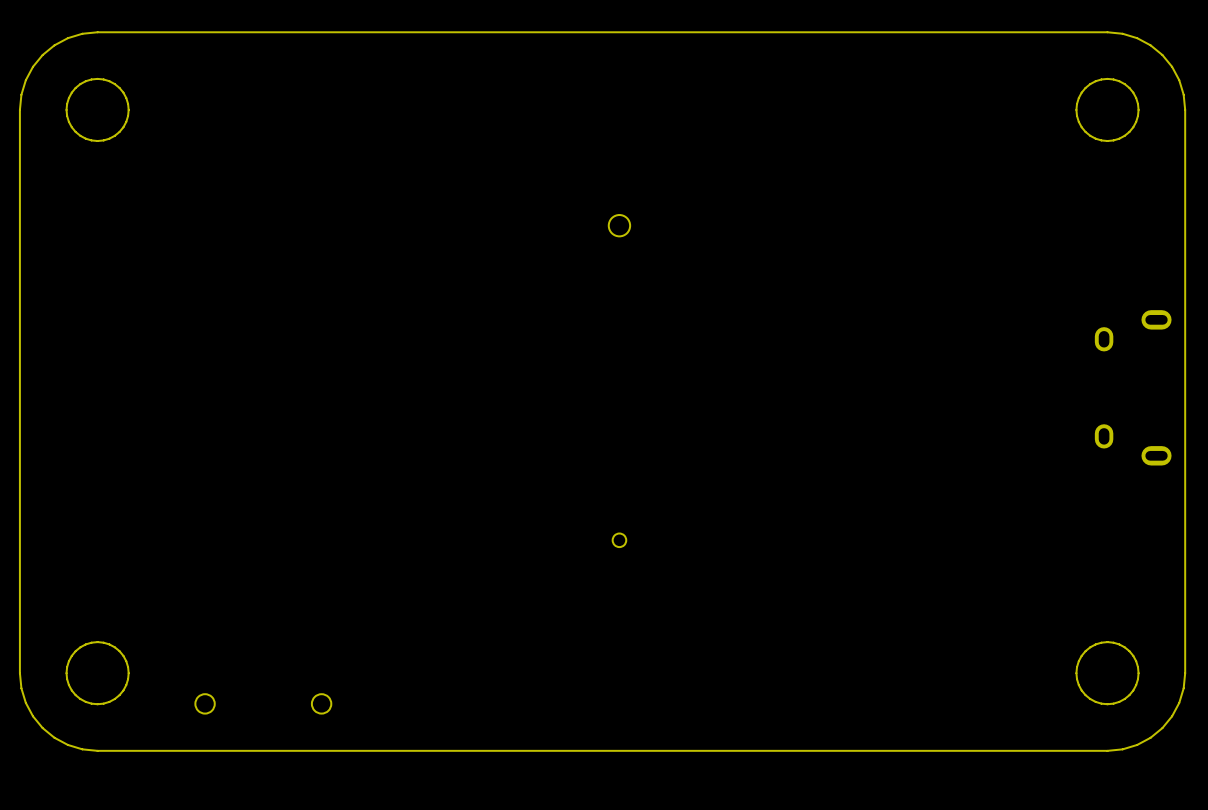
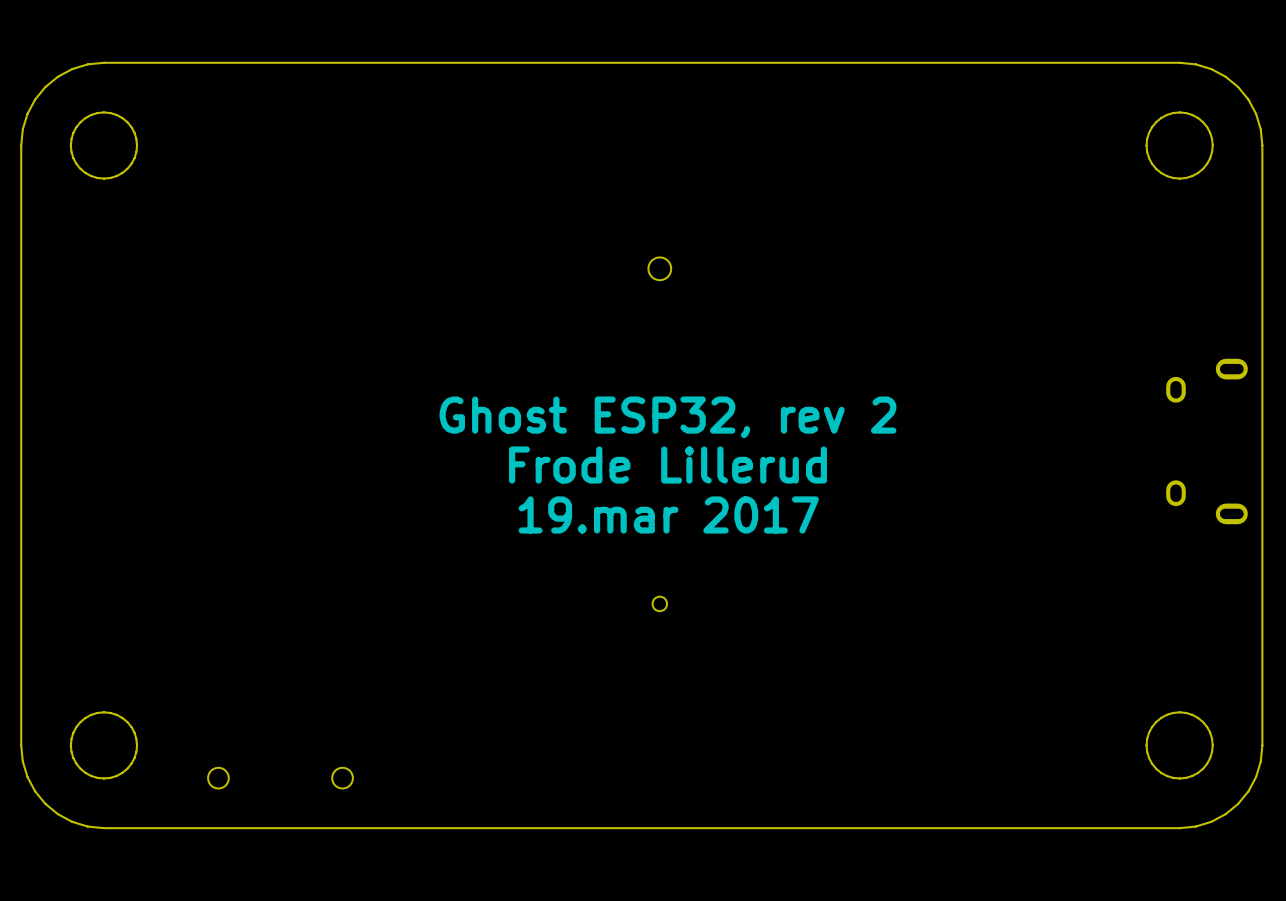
text: none -> Ghost ESP32, rev 2 (667, 417)
text: none -> Frode Lillerud (667, 465)
text: none -> 19.mar 2017 (668, 514)

